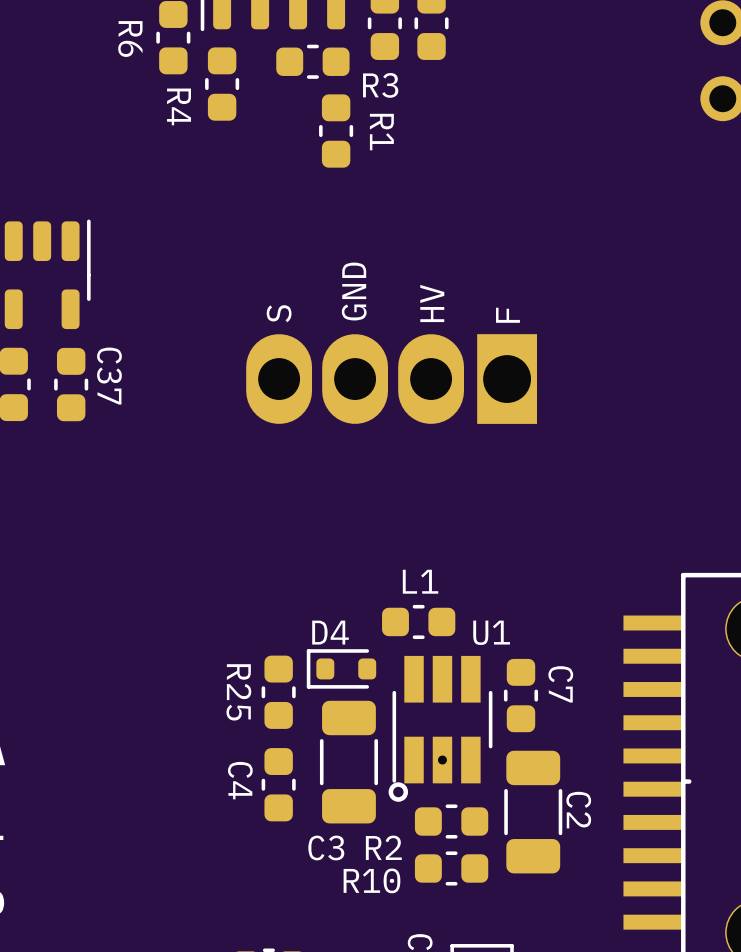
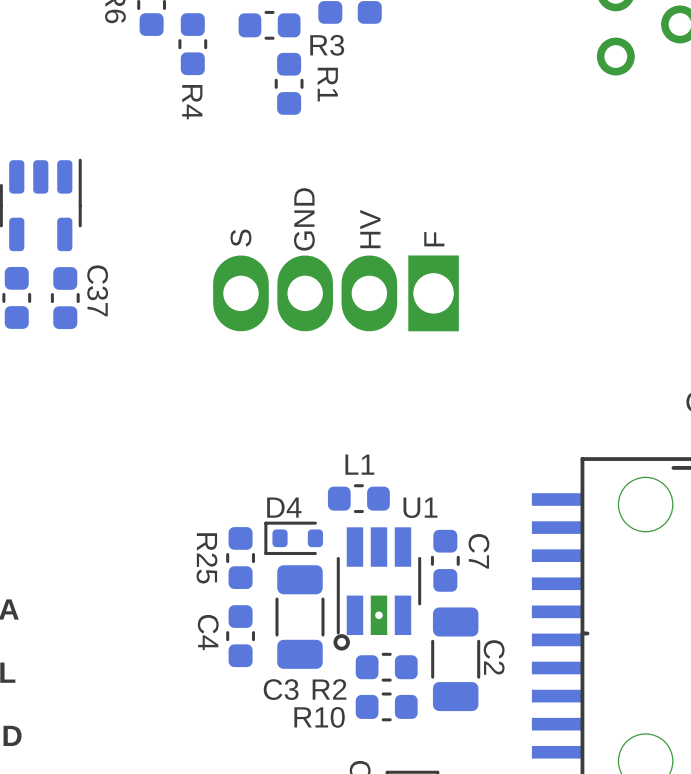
R4 name position: R4 (179, 106) -> R4 (192, 102)

